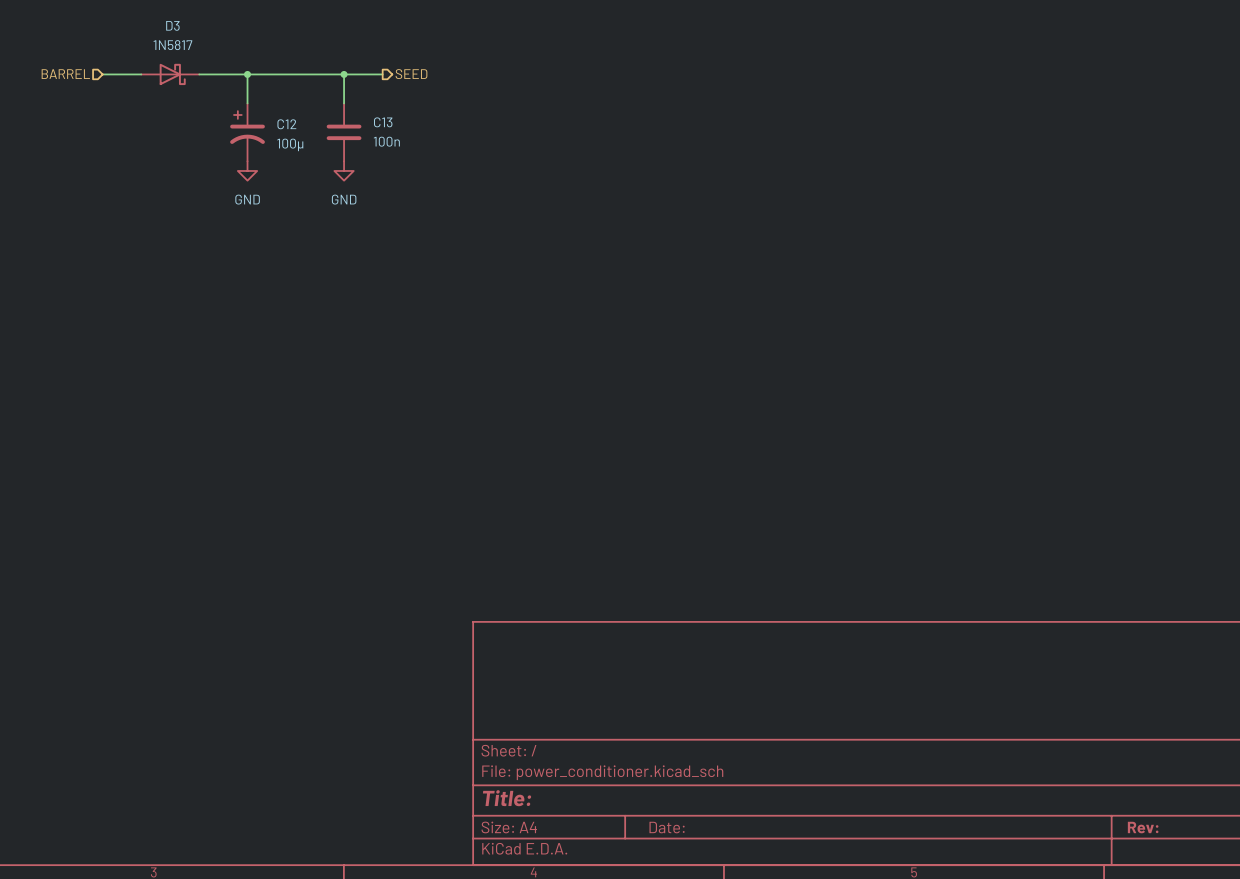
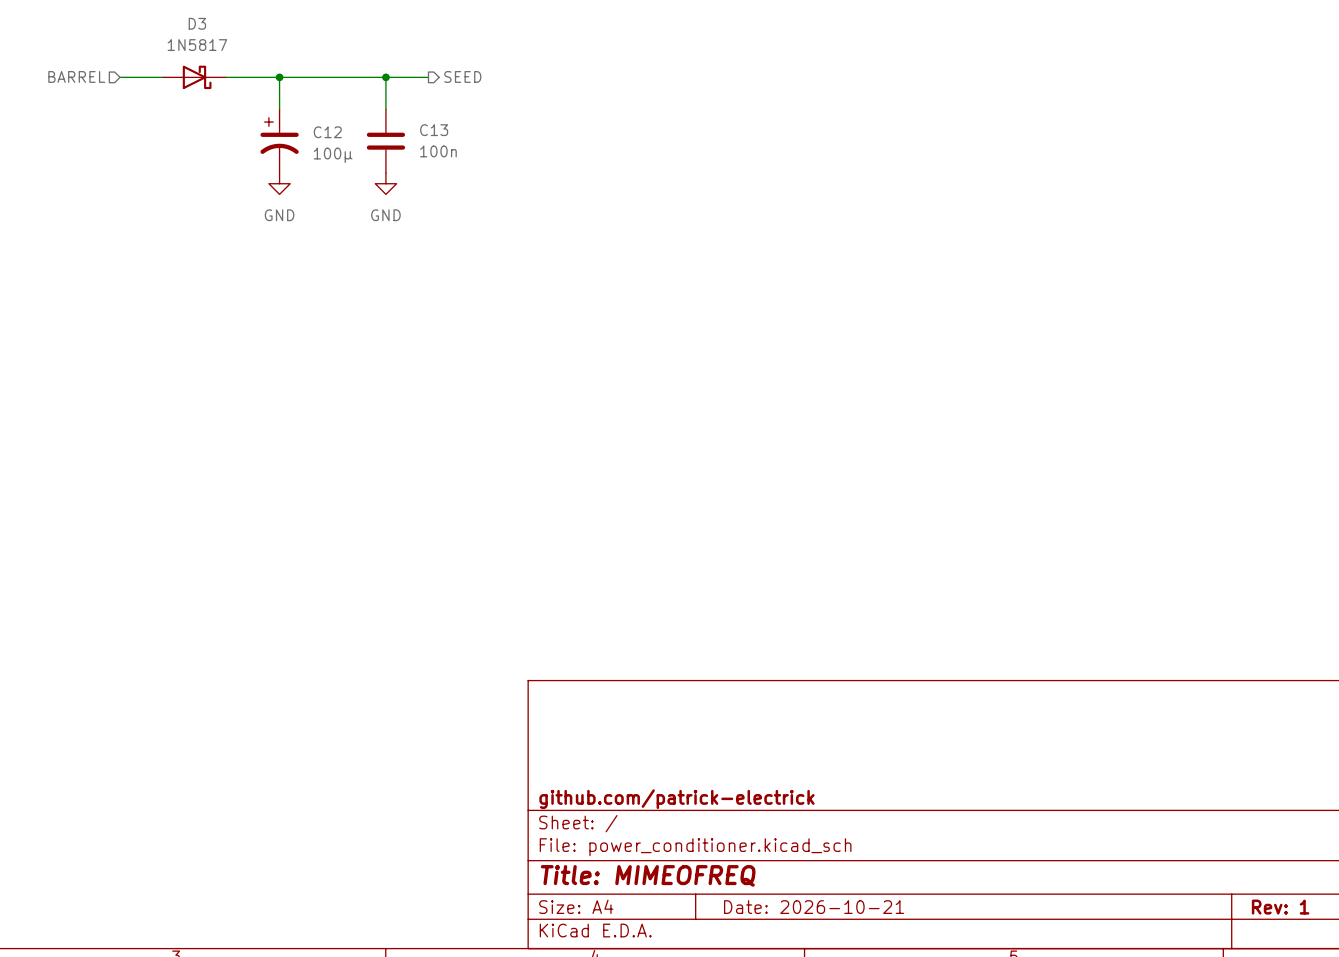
title block: none -> github.com/patrick-electrick (676, 799)
title block: Title: (507, 798) -> Title: MIMEOFREQ (648, 875)
title block: Date: (667, 827) -> Date: 2026-10-21 (814, 907)
title block: Rev: (1143, 827) -> Rev: 1 (1280, 907)

